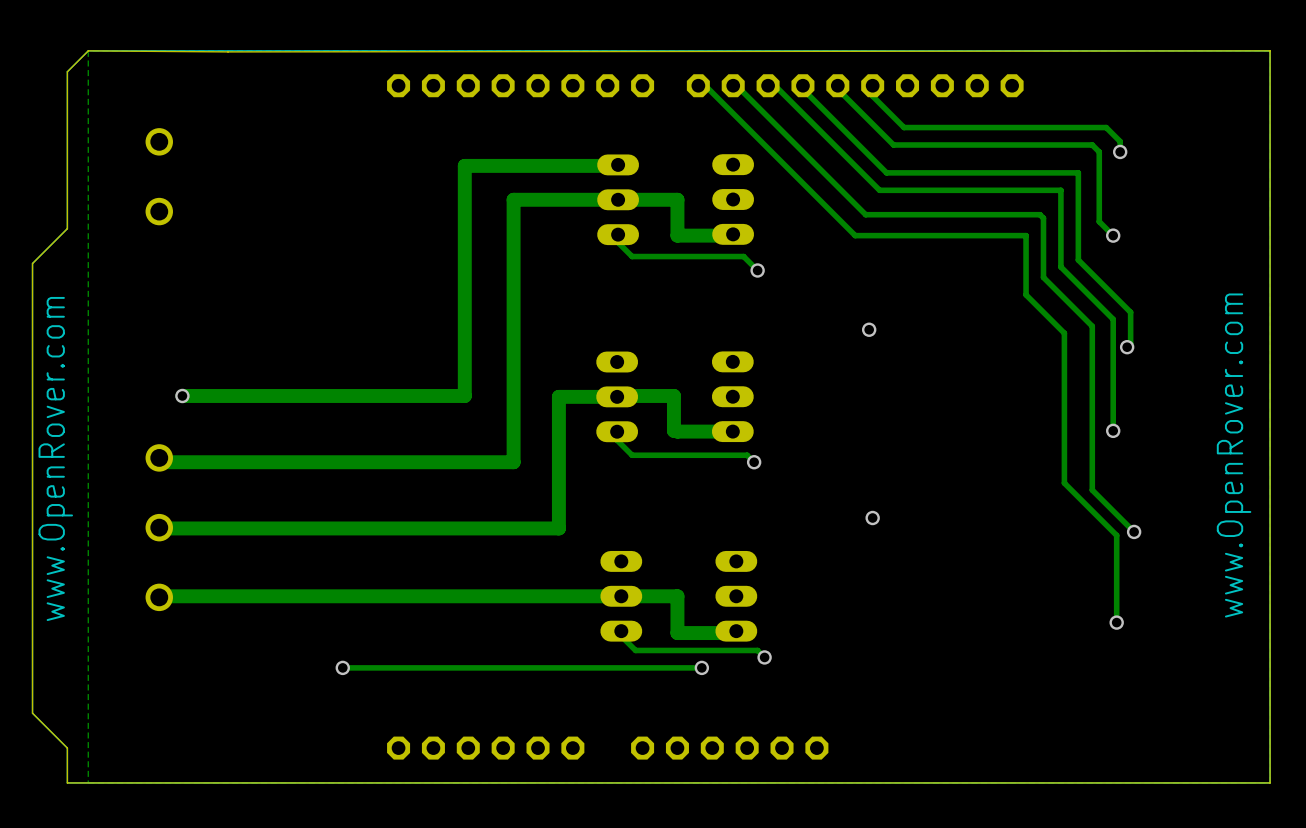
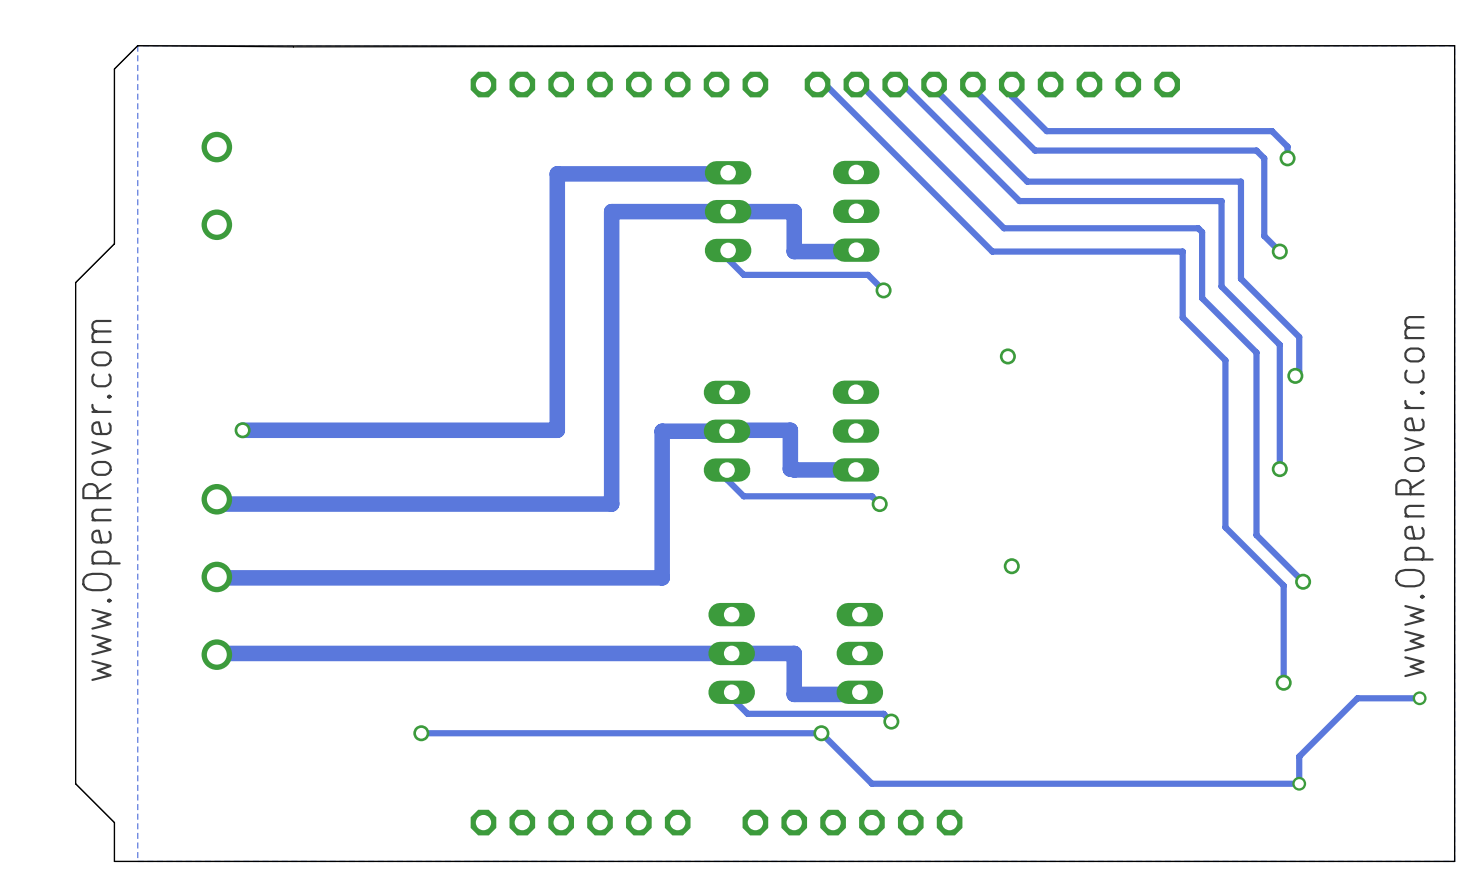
track: none -> (1419, 698) (1357, 698) (1299, 756) (1299, 783) (871, 783) (821, 733)
via: none -> (1419, 698)
via: none -> (1299, 783)

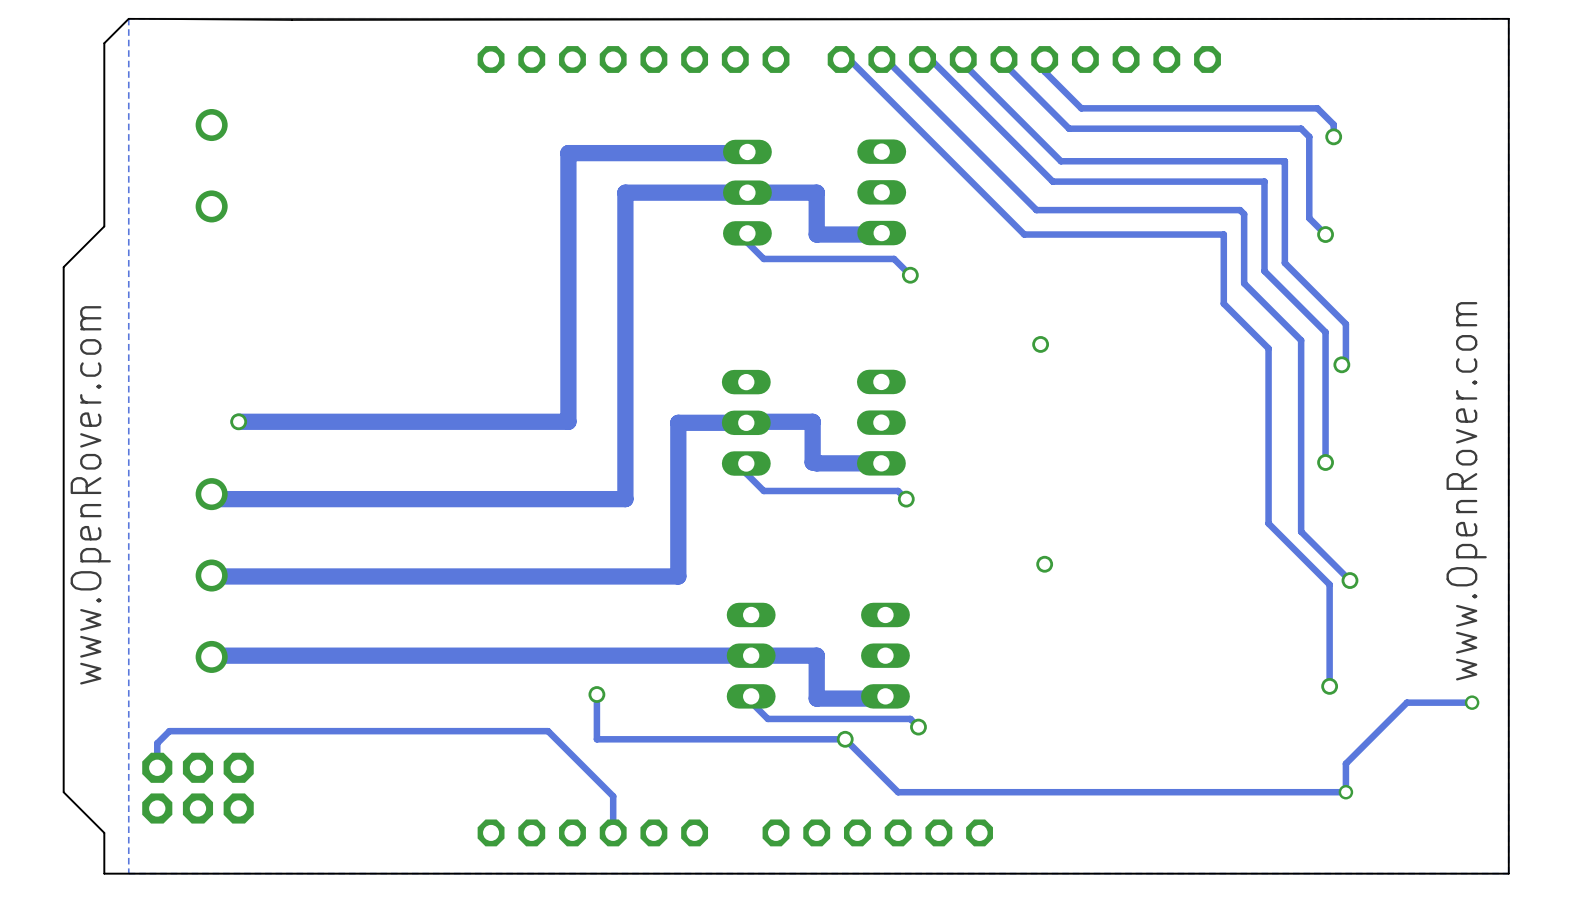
via: none -> (596, 694)
via: (421, 733) -> none
track: (584, 733) (421, 733) -> (596, 739) (596, 694)
track: none -> (157, 767) (157, 743) (169, 731) (548, 731) (613, 796) (613, 832)
part: none -> (197, 788)

